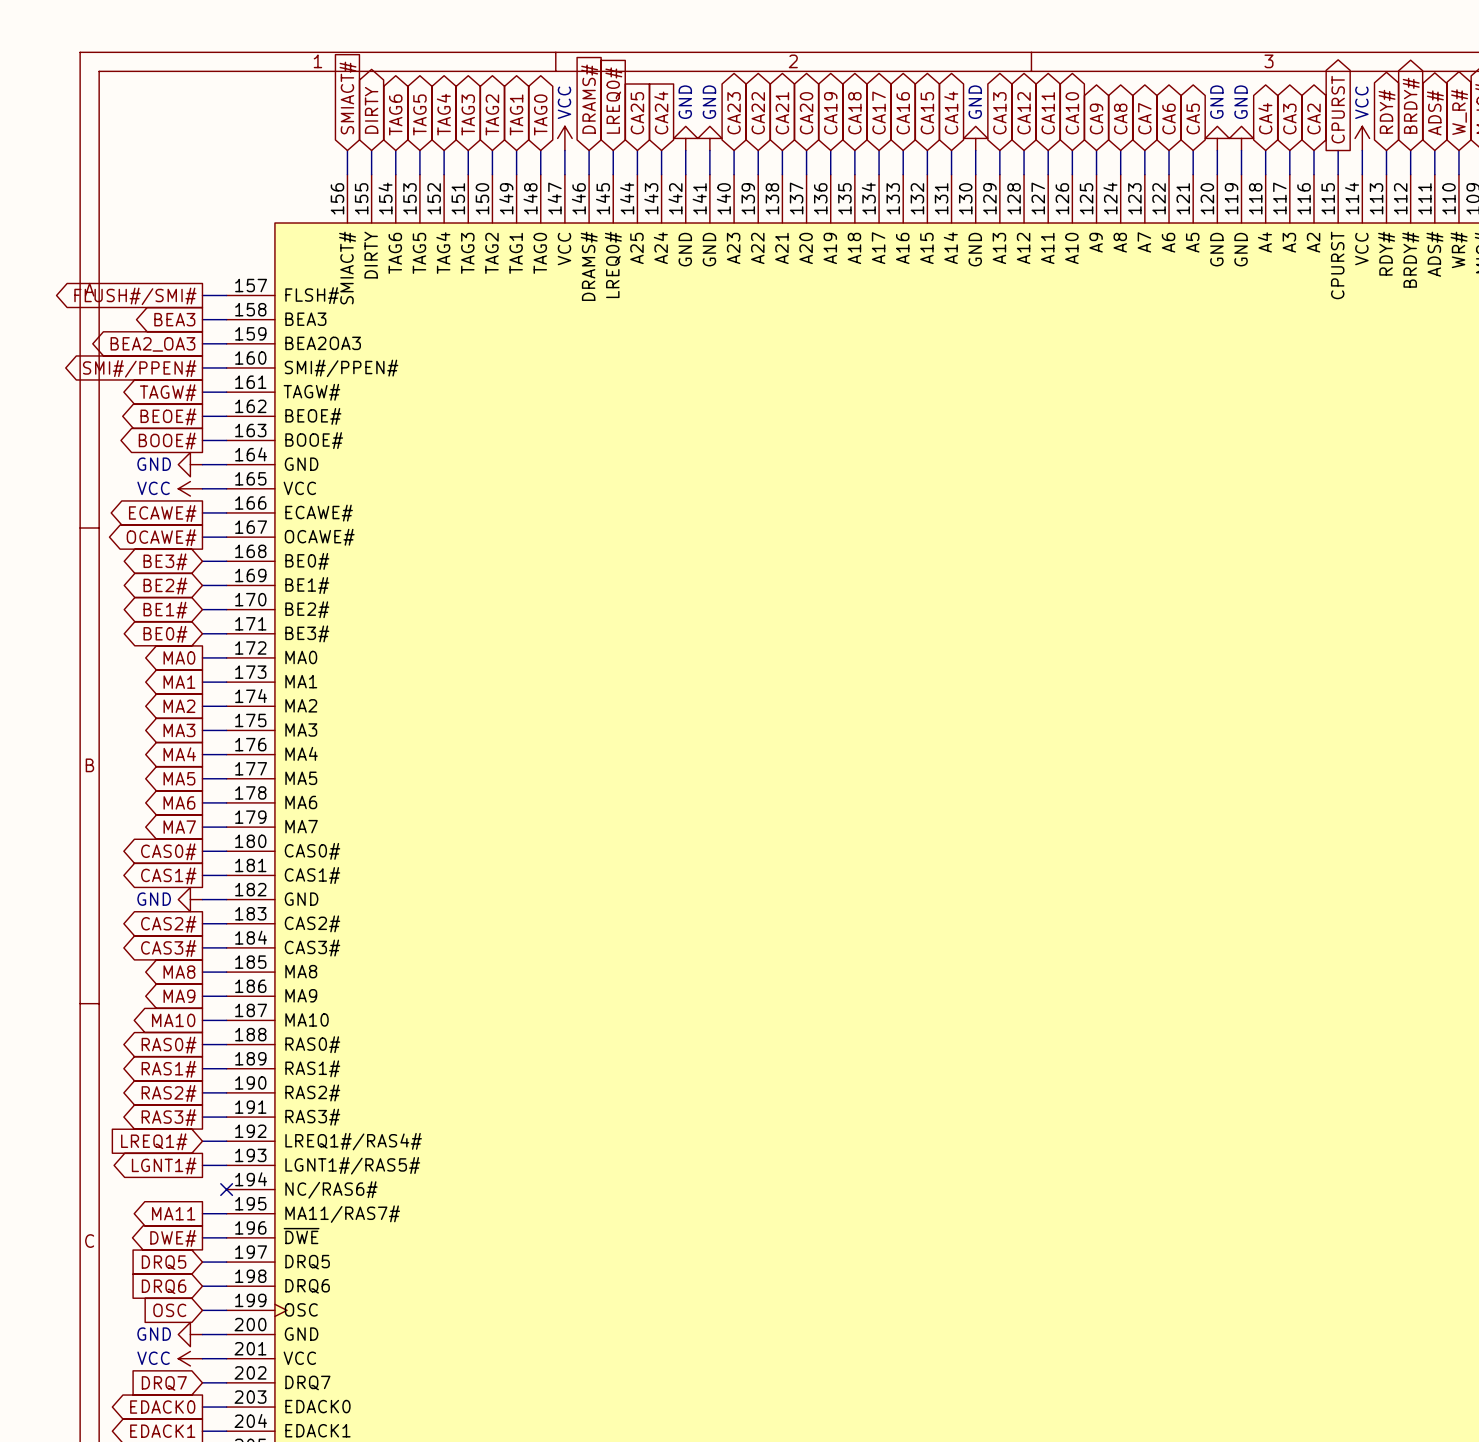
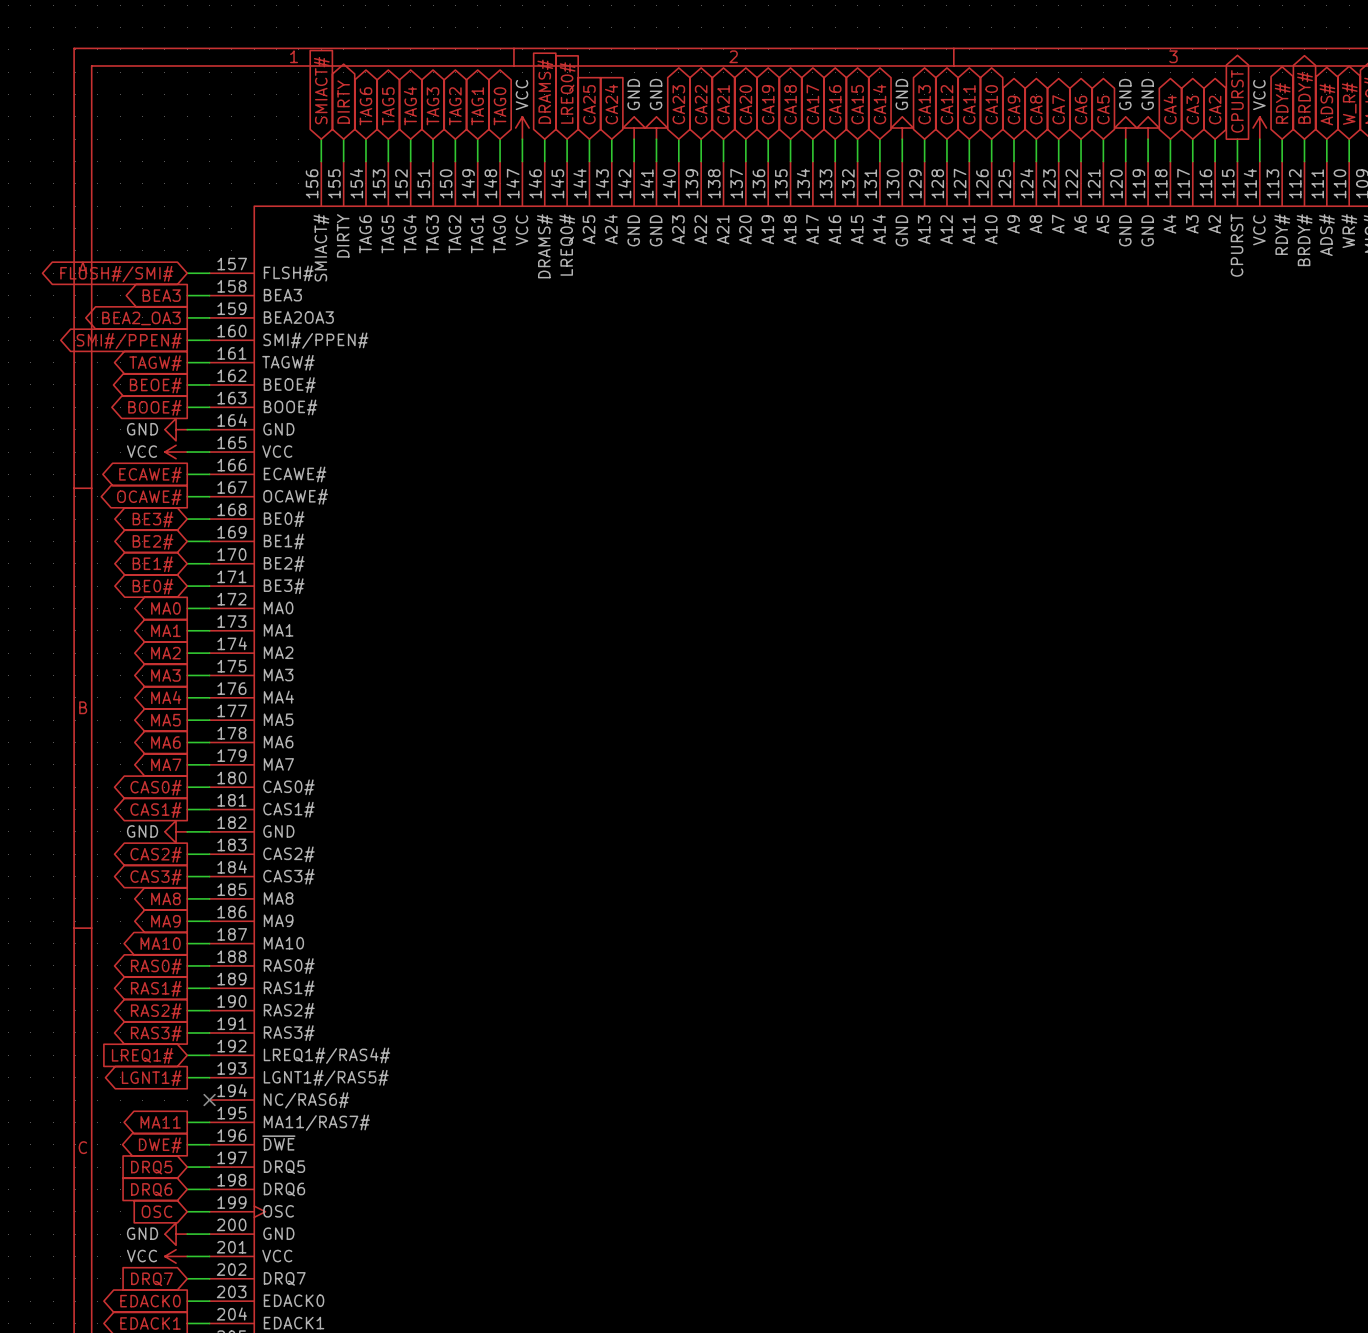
global label shape: output (135, 296) -> bidirectional (116, 274)

